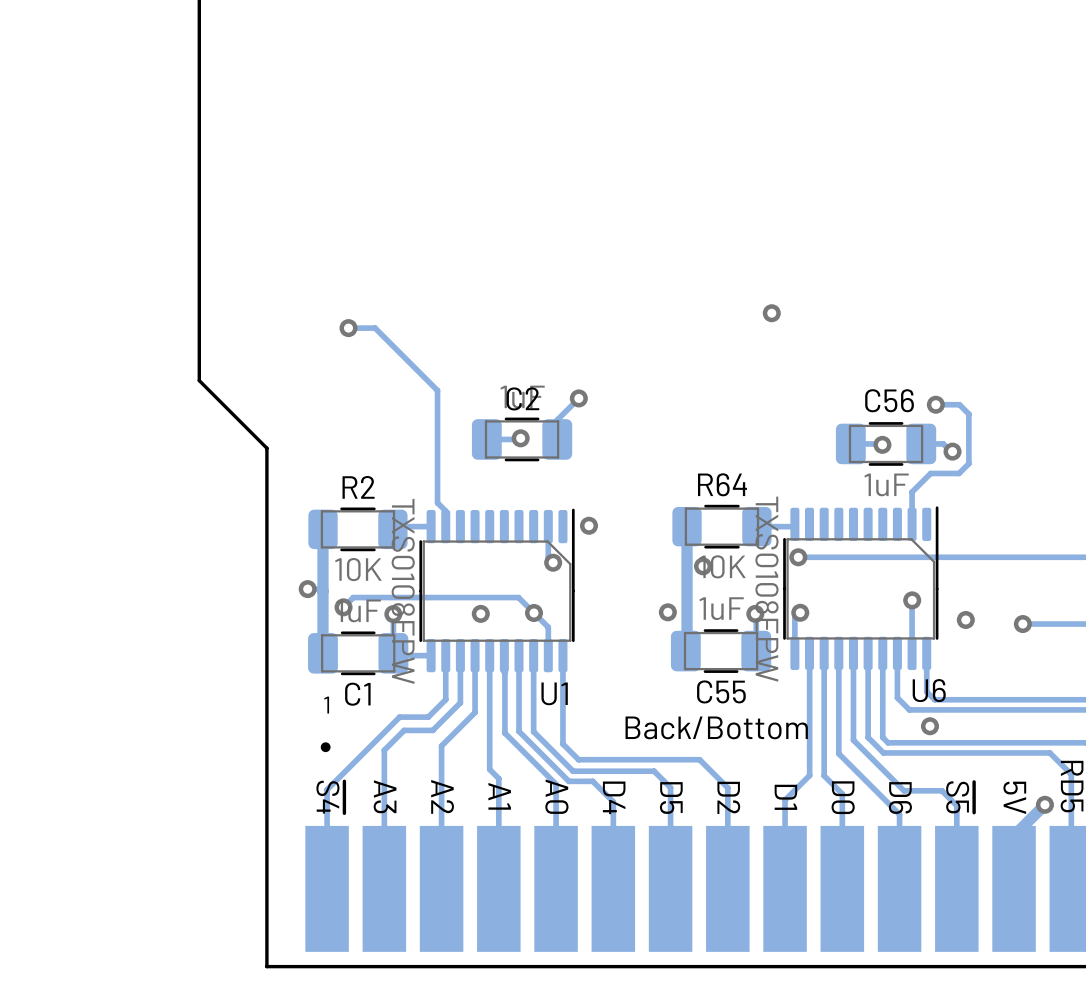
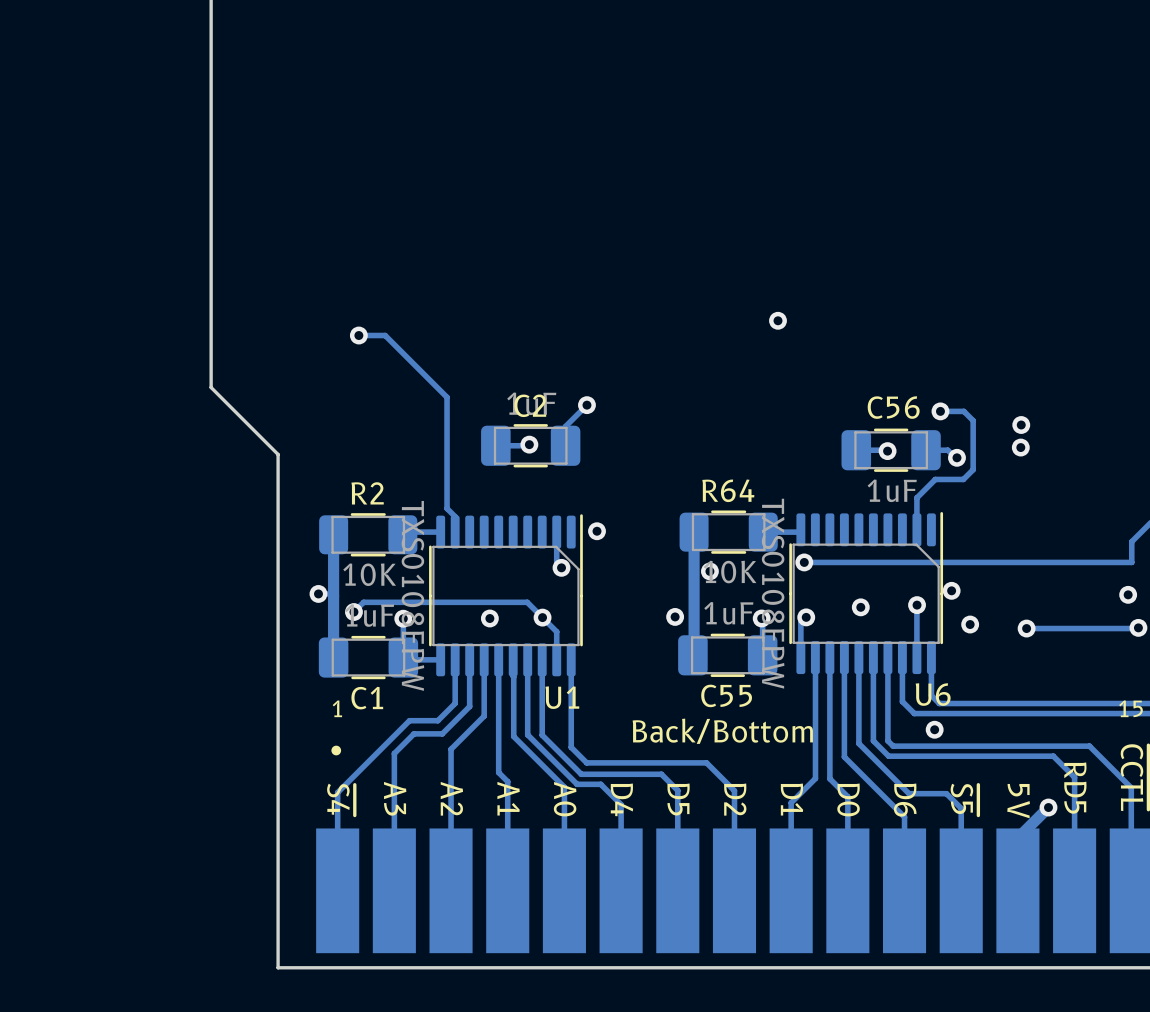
via: none -> (1021, 425)
via: none -> (1020, 447)
via: none -> (951, 590)
via: none -> (860, 607)

